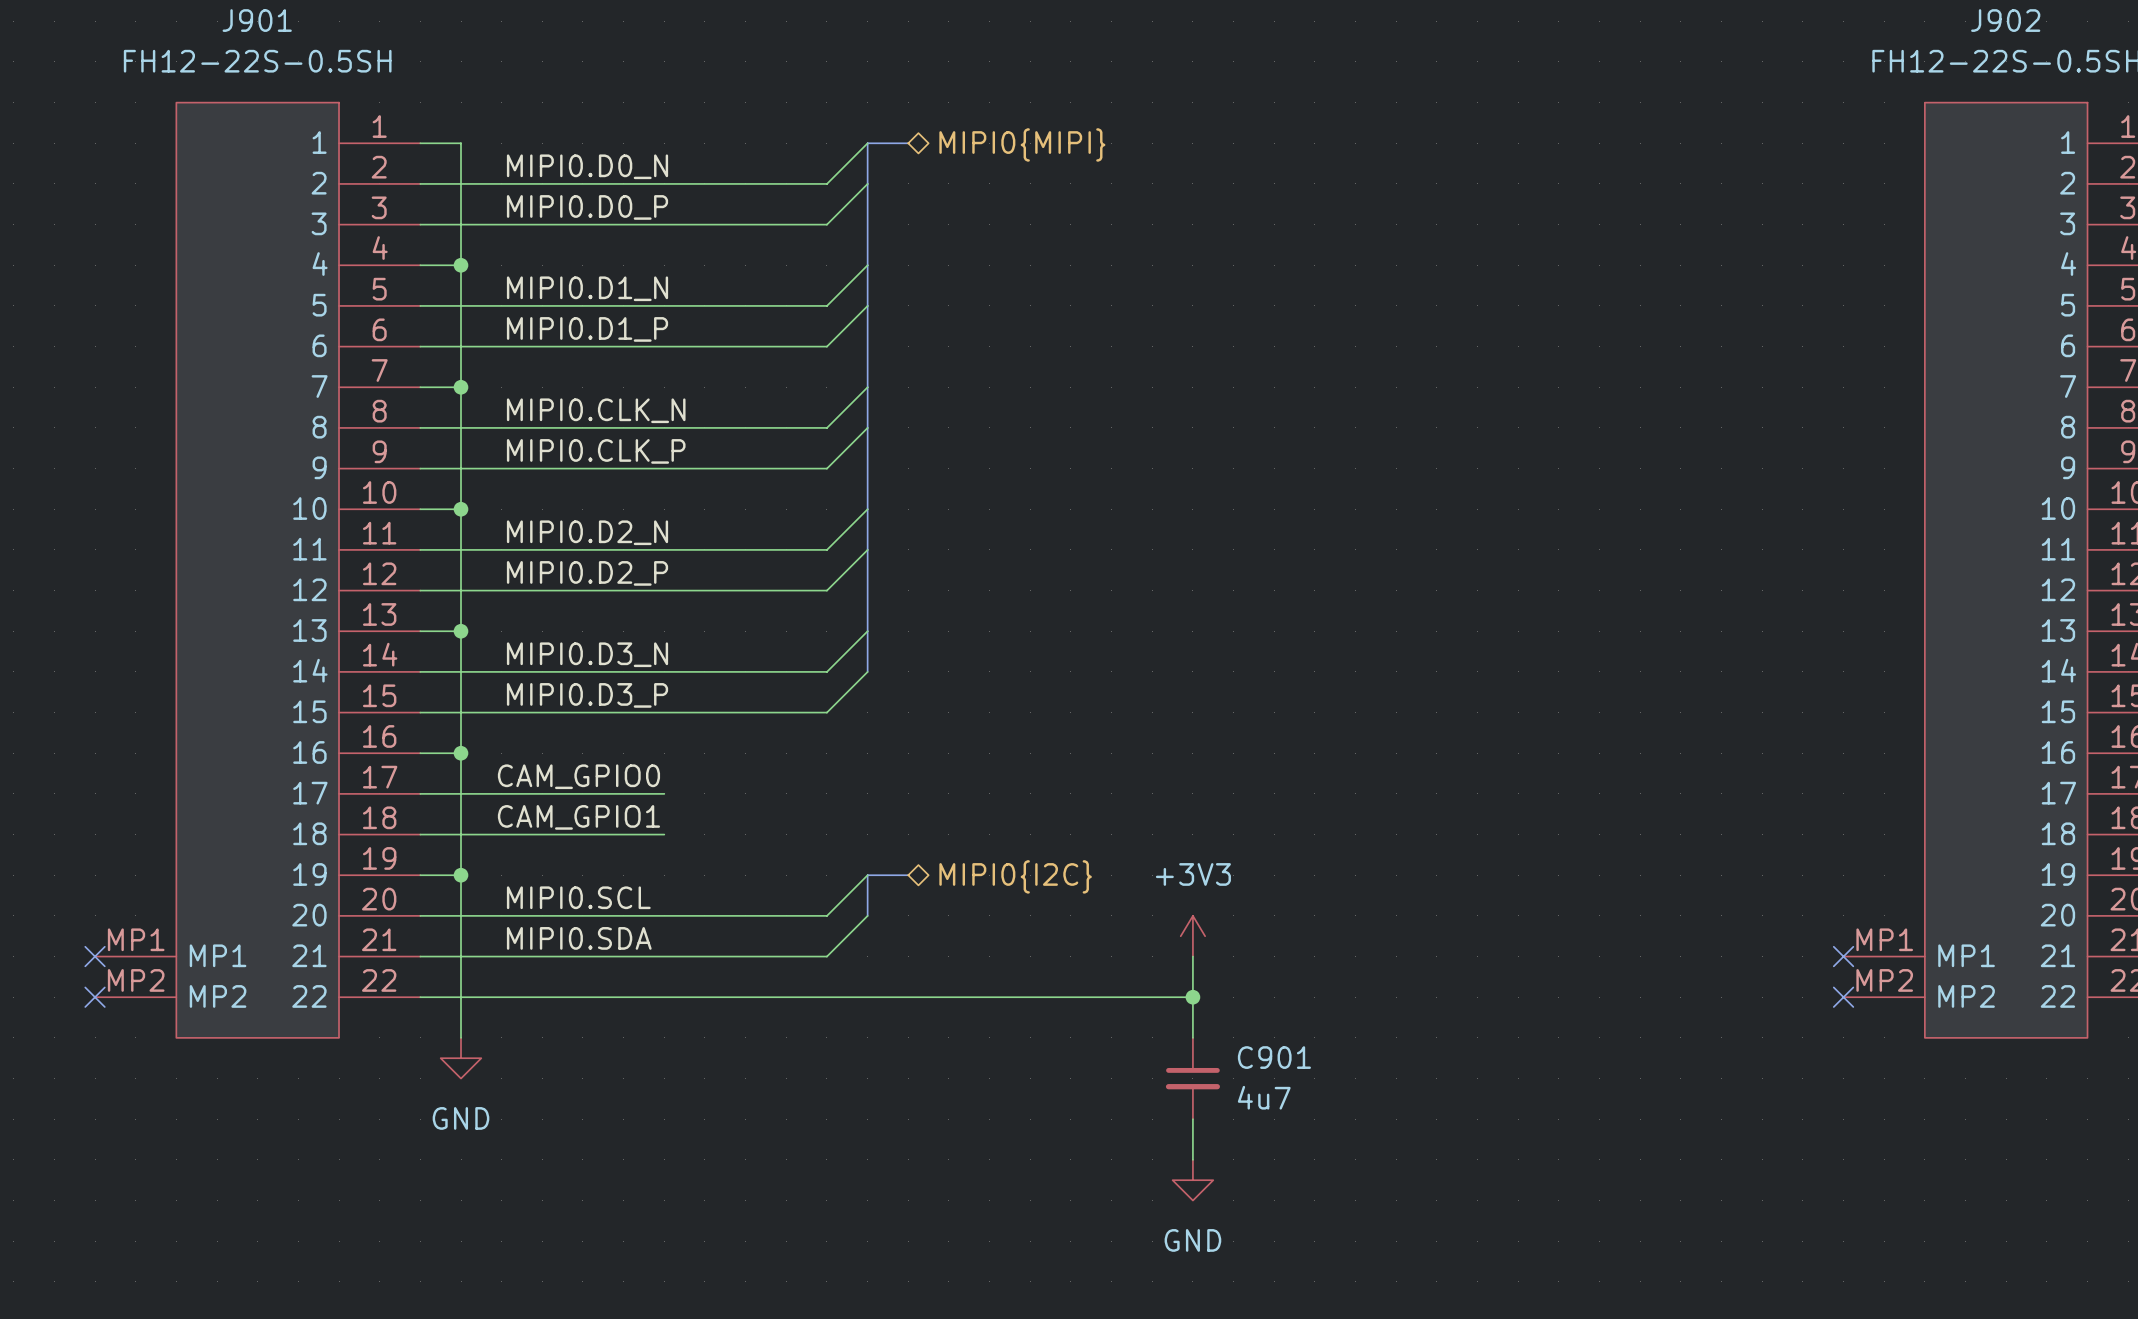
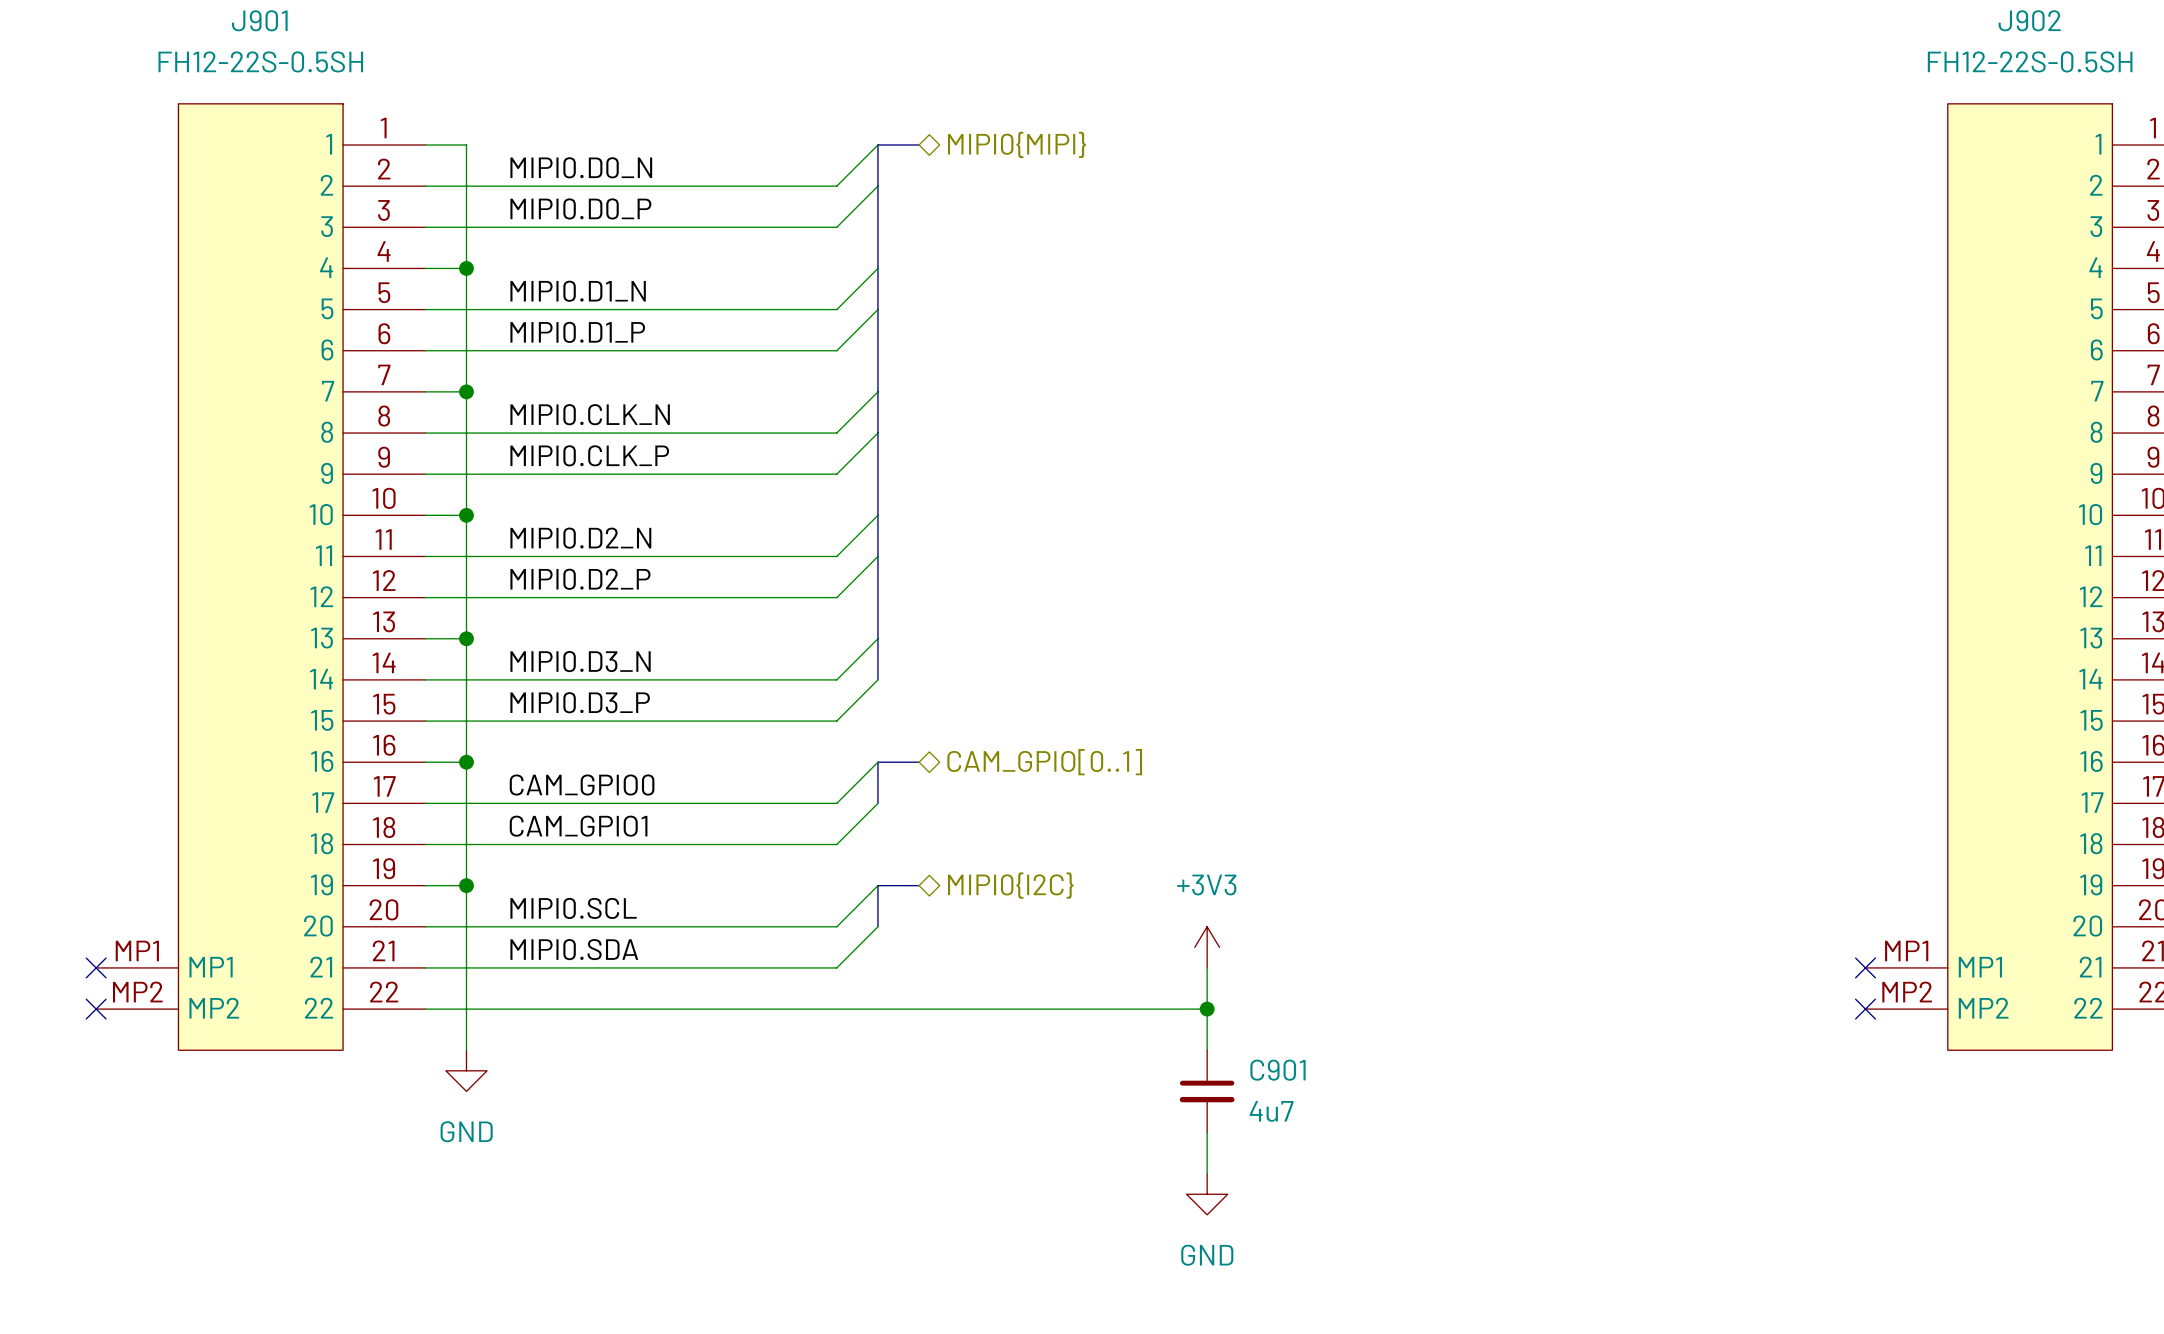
wire: none -> (877, 762) (836, 803) (672, 803)
bus: none -> (919, 762) (877, 762) (877, 803)
hierarchical label: none -> CAM_GPIO[0..1] (1044, 762)
label position: CAM_GPIO0 (578, 776) -> CAM_GPIO0 (582, 785)
wire: none -> (877, 803) (836, 844) (672, 844)
label position: CAM_GPIO1 (578, 817) -> CAM_GPIO1 (578, 826)

